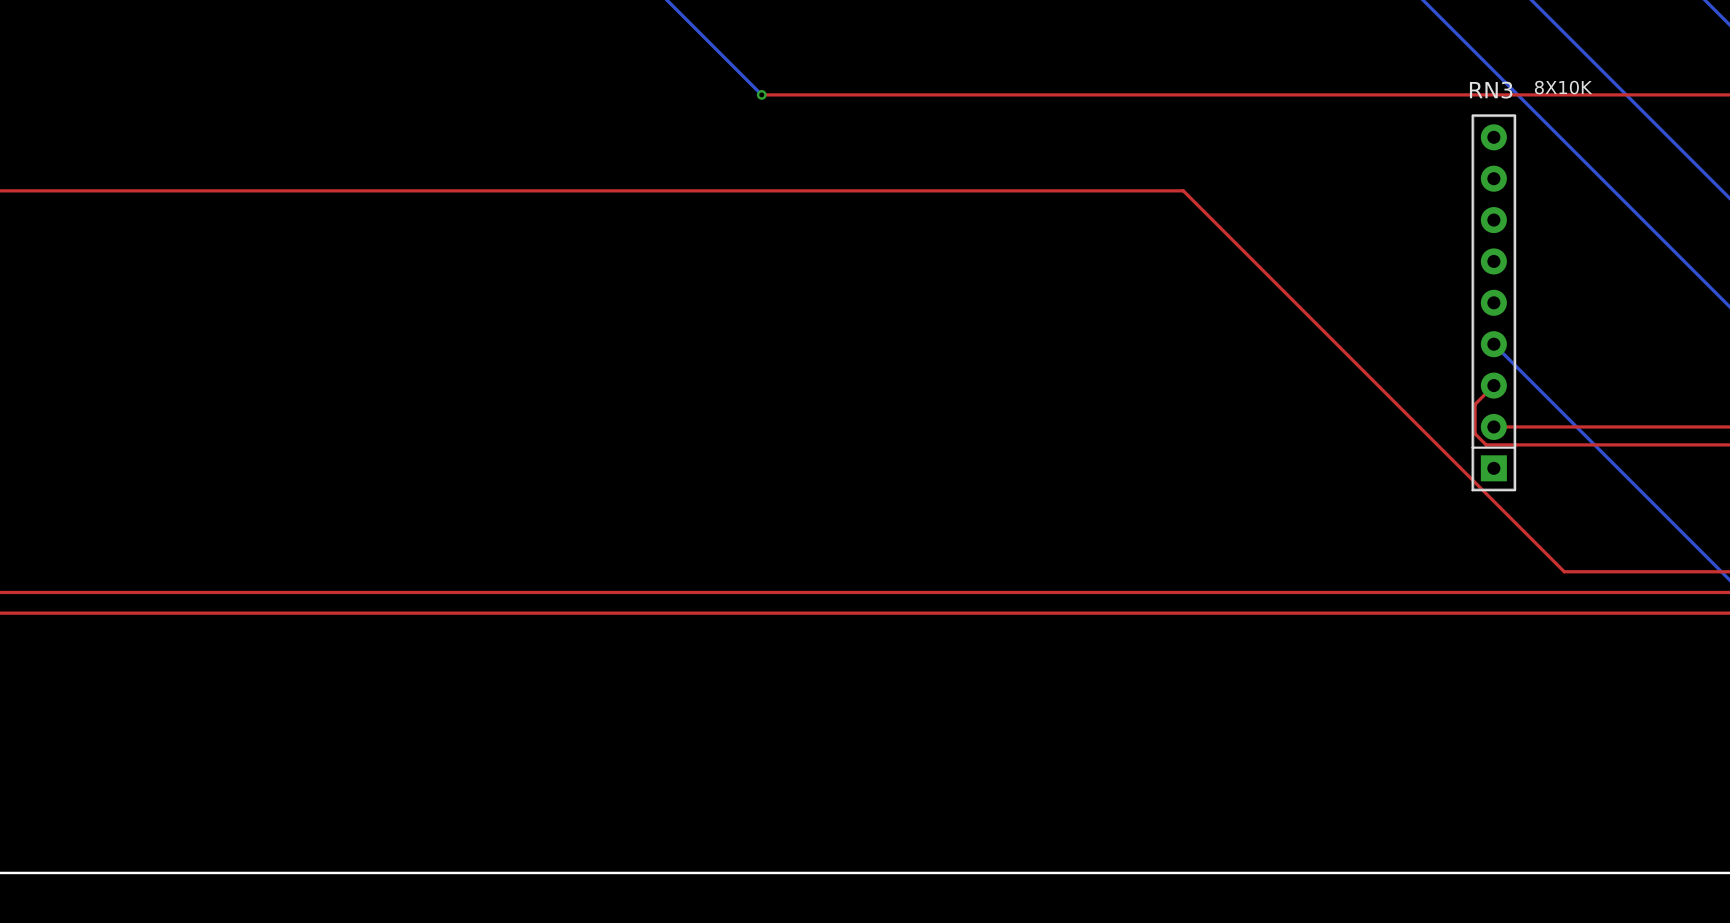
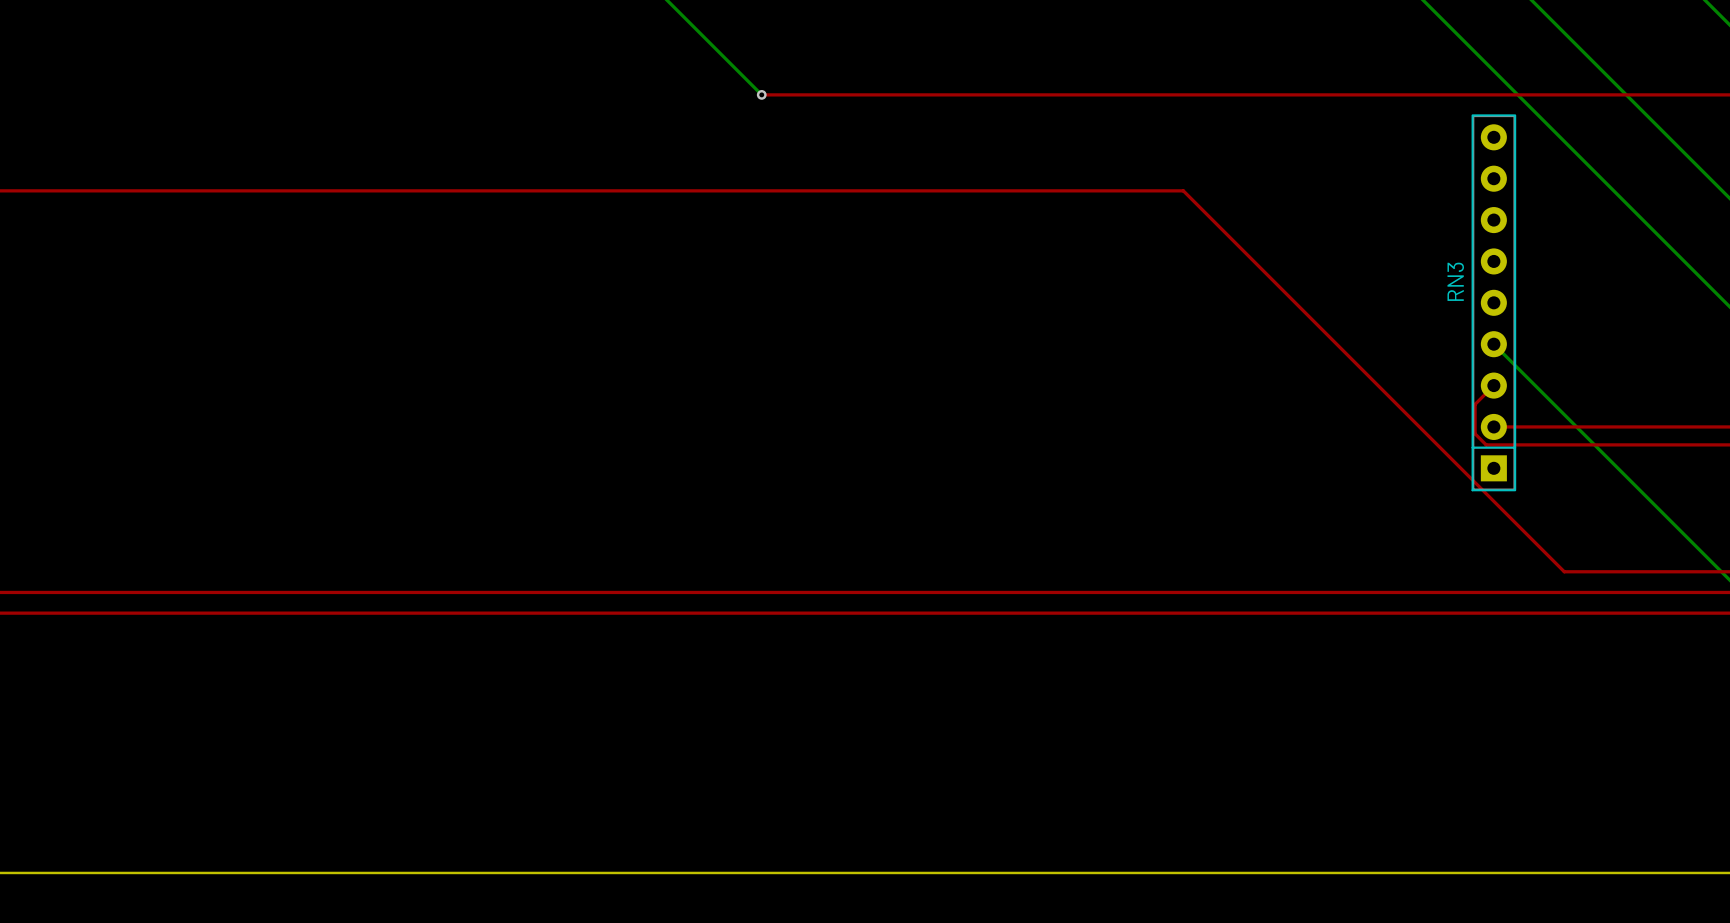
text: 8X10K (1563, 87) -> none
RN3 name rotation: 0° (1491, 90) -> 90° counterclockwise (1455, 281)
RN3 name position: RN3 (1491, 90) -> RN3 (1455, 281)

